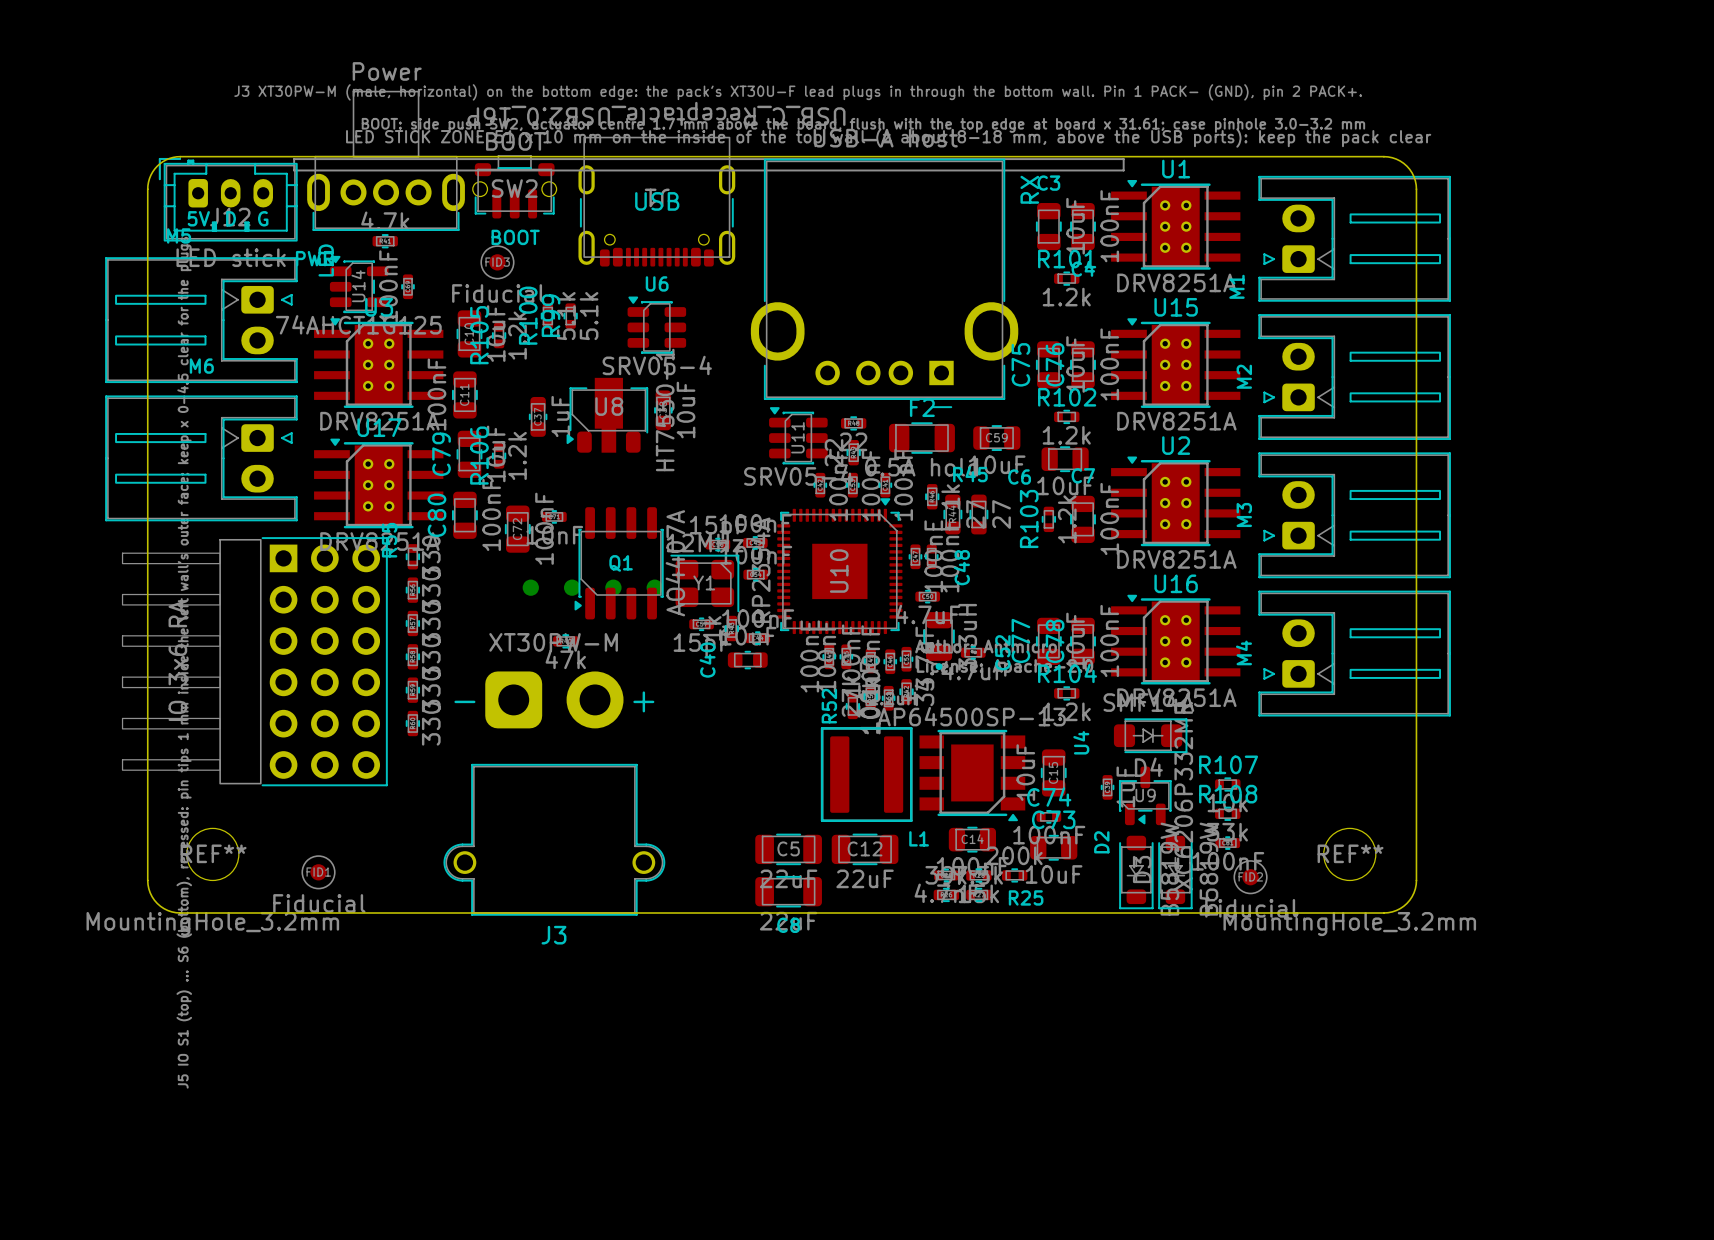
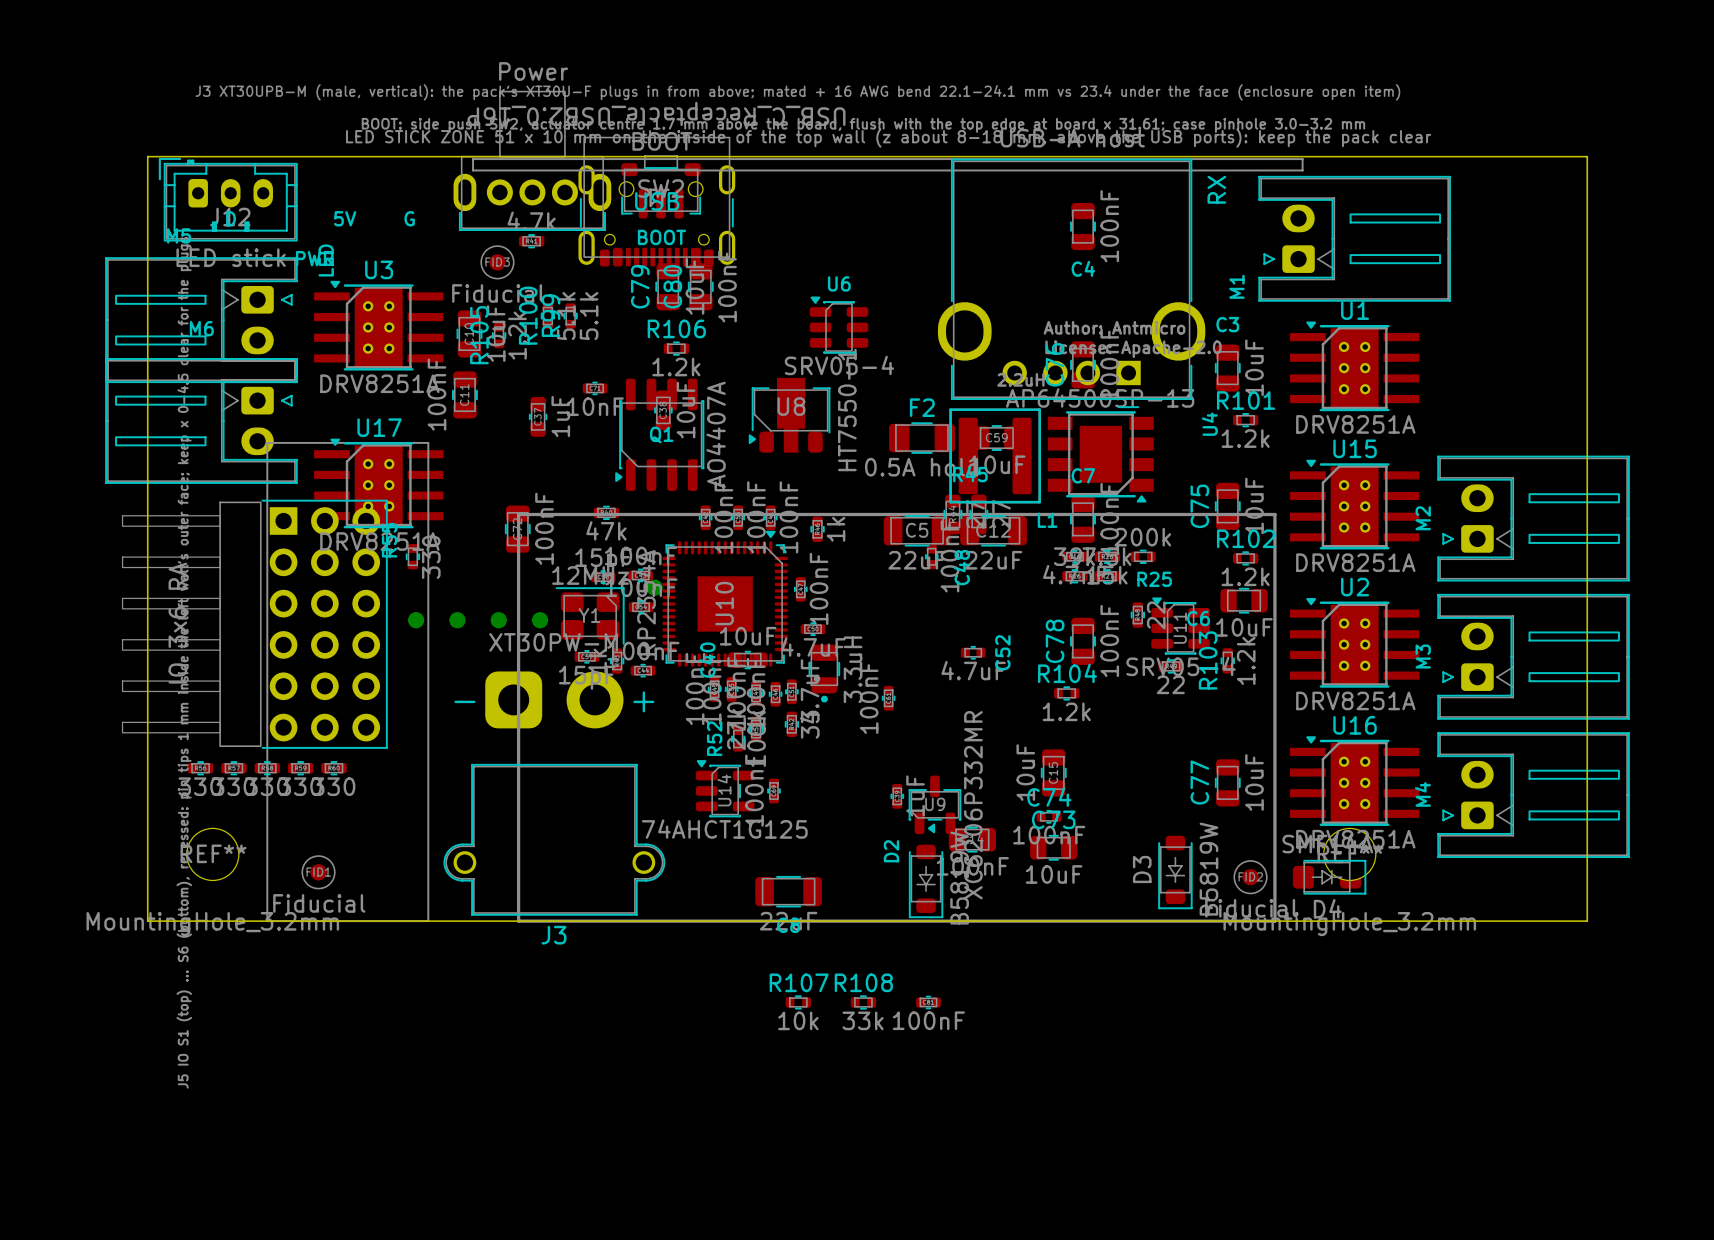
text: J3 XT30PW-M (male, horizontal) on the bottom edge: the pack's XT30U-F lead plugs in through the bottom wall. Pin 1 PACK- (GND), pin 2 PACK+. (798, 92) -> J3 XT30UPB-M (male, vertical): the pack's XT30U-F plugs in from above; mated + 16 AWG bend 22.1-24.1 mm vs 23.4 under the face (enclosure open item) (797, 92)
board edge: (180, 156) (166, 159) (157, 166) (150, 175) (147, 189) -> (180, 156) (147, 156) (147, 189)
board edge: (1383, 156) (1396, 159) (1406, 166) (1413, 176) (1416, 189) (1416, 880) (1412, 896) (1400, 908) (1383, 913) (180, 913) (167, 910) (157, 903) (150, 892) (147, 880) -> (1383, 156) (1587, 156) (1587, 921) (147, 921) (147, 880)
line: (473, 159) (294, 159) (294, 170) (473, 170) -> (473, 159) (473, 170)
line: (1123, 159) (1123, 170) -> (1123, 159) (1302, 159) (1302, 170) (1123, 170)
part position: (386, 160) -> (532, 160)
SW2 position: (514, 186) -> (661, 186)
text position: RX (1029, 189) -> RX (1216, 189)
text position: 5V (198, 218) -> 5V (345, 218)
text position: G (263, 218) -> G (409, 218)
U1 position: (1175, 224) -> (1354, 366)
C3 position: (1048, 226) -> (1227, 368)
text position: BOOT (515, 237) -> BOOT (662, 237)
part position: (385, 241) -> (531, 241)
R101 position: (1066, 278) -> (1245, 420)
part position: (884, 283) -> (1071, 283)
U14 position: (359, 284) -> (725, 788)
part position: (407, 286) -> (773, 791)
U6 position: (656, 325) -> (839, 325)
U3 position: (378, 363) -> (378, 325)
U15 position: (1175, 363) -> (1354, 504)
C75 position: (1048, 364) -> (1227, 506)
M2 position: (1354, 377) -> (1533, 518)
U8 position: (607, 415) -> (789, 415)
R102 position: (1066, 416) -> (1245, 558)
part rotation: 0° (853, 423) -> 90° clockwise (1137, 615)
part position: (853, 423) -> (1137, 615)
U11 position: (798, 435) -> (1180, 626)
line: none -> (267, 442) (428, 442) (428, 921) (267, 921) (267, 442)
part rotation: 0° (853, 452) -> 90° clockwise (1171, 666)
part position: (853, 452) -> (1171, 666)
C79 position: (469, 454) -> (668, 286)
R106 rotation: 0° (499, 455) -> 90° clockwise (676, 348)
R106 position: (499, 455) -> (676, 348)
M6 position: (201, 458) -> (201, 420)
C6 position: (1065, 459) -> (1244, 600)
part position: (820, 485) -> (705, 517)
part position: (852, 485) -> (738, 517)
part position: (885, 485) -> (770, 517)
part position: (932, 496) -> (817, 529)
U2 position: (1175, 501) -> (1354, 642)
line: none -> (518, 514) (1274, 514) (1274, 921) (518, 921) (518, 514)
C80 position: (464, 515) -> (700, 286)
M3 position: (1354, 515) -> (1533, 656)
part position: (554, 516) -> (595, 388)
R103 position: (1048, 519) -> (1227, 660)
part position: (755, 542) -> (640, 575)
part position: (717, 544) -> (603, 577)
part position: (915, 556) -> (800, 589)
Q1 position: (619, 563) -> (659, 434)
U10 position: (839, 566) -> (725, 598)
part position: (755, 574) -> (641, 607)
Y1 position: (704, 583) -> (590, 615)
part: (530, 587) -> none
part: (572, 587) -> none
part: (613, 587) -> none
part rotation: 0° (412, 590) -> 90° clockwise (200, 768)
part position: (412, 590) -> (200, 768)
part position: (927, 596) -> (813, 629)
part: none -> (416, 620)
part: none -> (457, 620)
part: none -> (498, 620)
part: none -> (540, 620)
part rotation: 0° (412, 623) -> 90° clockwise (233, 768)
part position: (412, 623) -> (233, 768)
part position: (701, 624) -> (586, 656)
part position: (731, 628) -> (617, 661)
part position: (757, 638) -> (643, 670)
U16 position: (1175, 639) -> (1354, 781)
part position: (565, 641) -> (606, 512)
part position: (939, 641) -> (824, 673)
C77 position: (1048, 641) -> (1227, 782)
M4 position: (1354, 653) -> (1533, 795)
part rotation: 0° (412, 656) -> 90° clockwise (267, 768)
part position: (412, 656) -> (267, 768)
part position: (829, 656) -> (714, 689)
part position: (846, 656) -> (731, 689)
part position: (906, 659) -> (791, 691)
part position: (870, 660) -> (756, 693)
part position: (254, 661) -> (254, 624)
part position: (890, 661) -> (775, 694)
part rotation: 0° (412, 690) -> 90° clockwise (300, 768)
part position: (412, 690) -> (300, 768)
part position: (906, 691) -> (791, 724)
part position: (870, 696) -> (756, 729)
R52 position: (852, 706) -> (738, 738)
part rotation: 0° (412, 723) -> 90° clockwise (333, 768)
part position: (412, 723) -> (333, 768)
D4 position: (1150, 735) -> (1329, 877)
L1 position: (866, 774) -> (995, 455)
U4 position: (972, 775) -> (1100, 456)
R107 position: (1227, 784) -> (798, 1002)
part position: (1107, 787) -> (897, 796)
U9 position: (1145, 795) -> (934, 804)
R108 position: (1227, 813) -> (863, 1002)
part position: (1227, 843) -> (928, 1002)
C5 position: (788, 849) -> (917, 530)
C12 position: (865, 849) -> (993, 530)
D2 position: (1136, 872) -> (926, 881)
part position: (946, 875) -> (1074, 556)
part position: (978, 875) -> (1107, 556)
R25 position: (1014, 875) -> (1143, 556)
part position: (946, 894) -> (1074, 576)
part position: (978, 894) -> (1107, 576)

